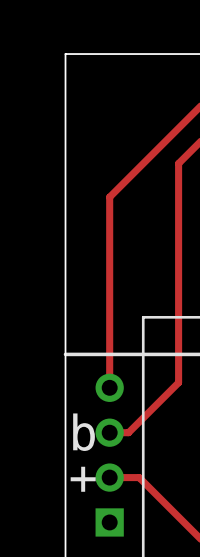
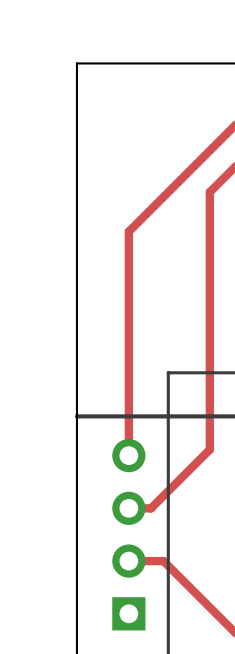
text: b (84, 432) -> none
text: + (83, 479) -> none

